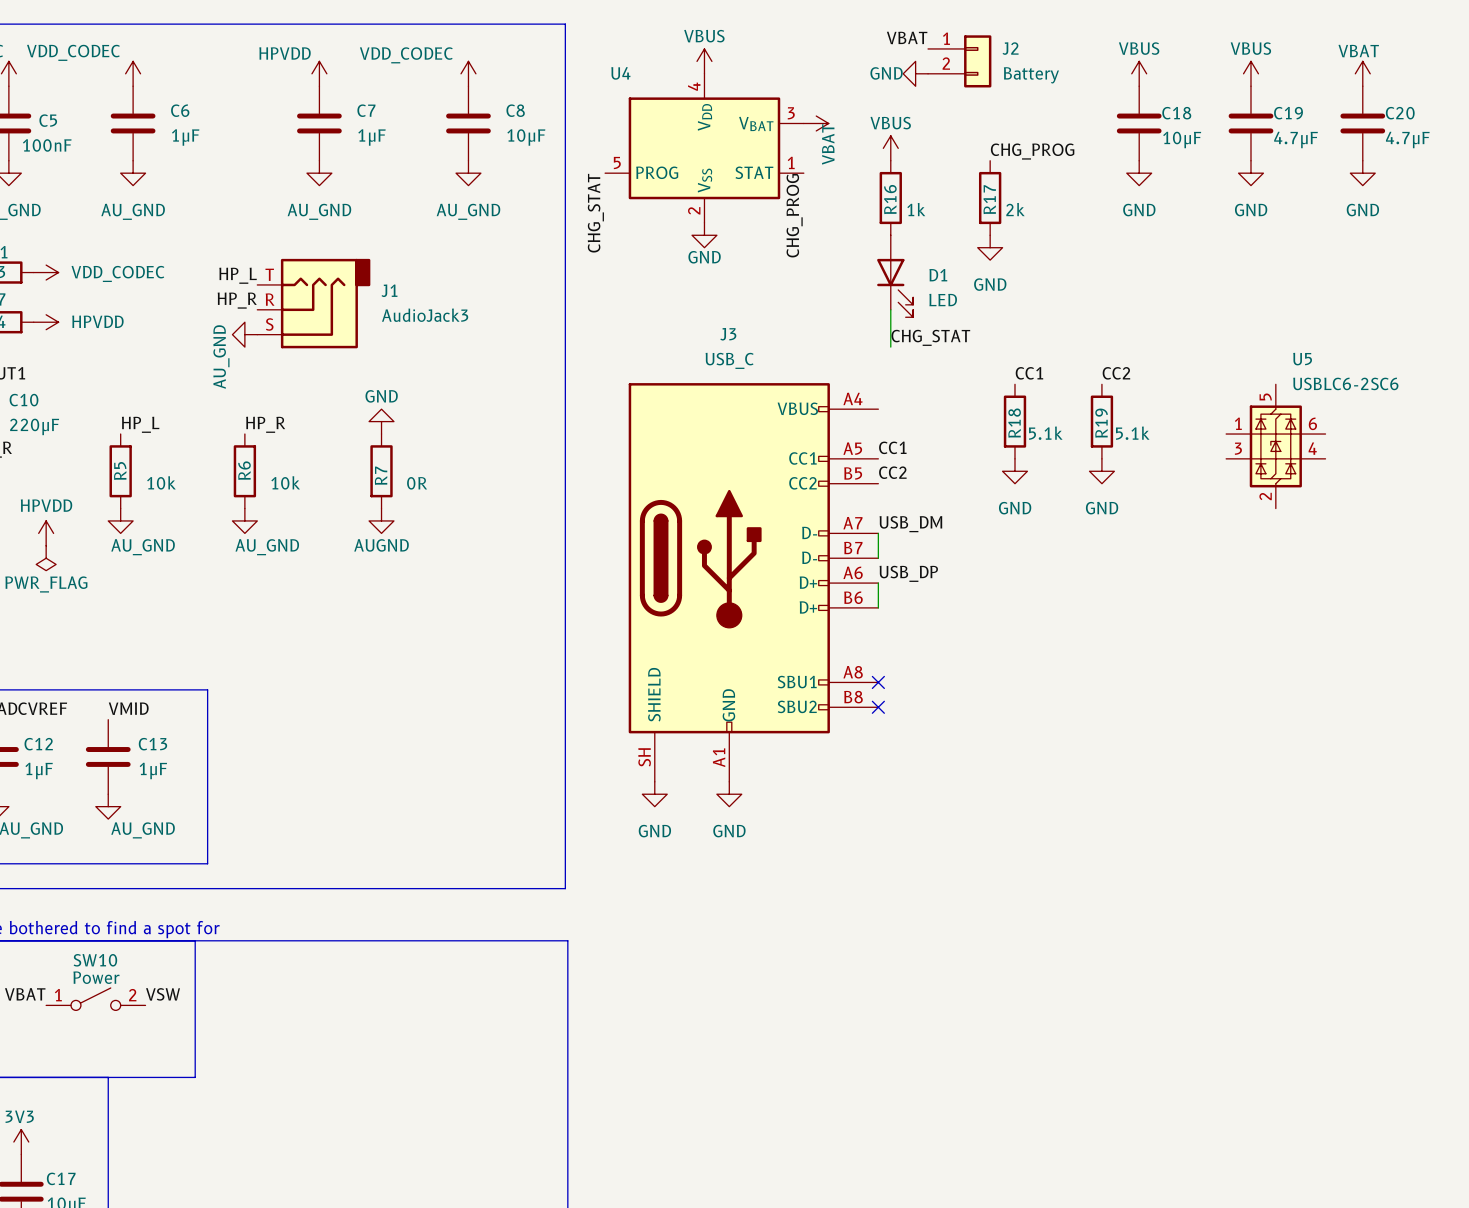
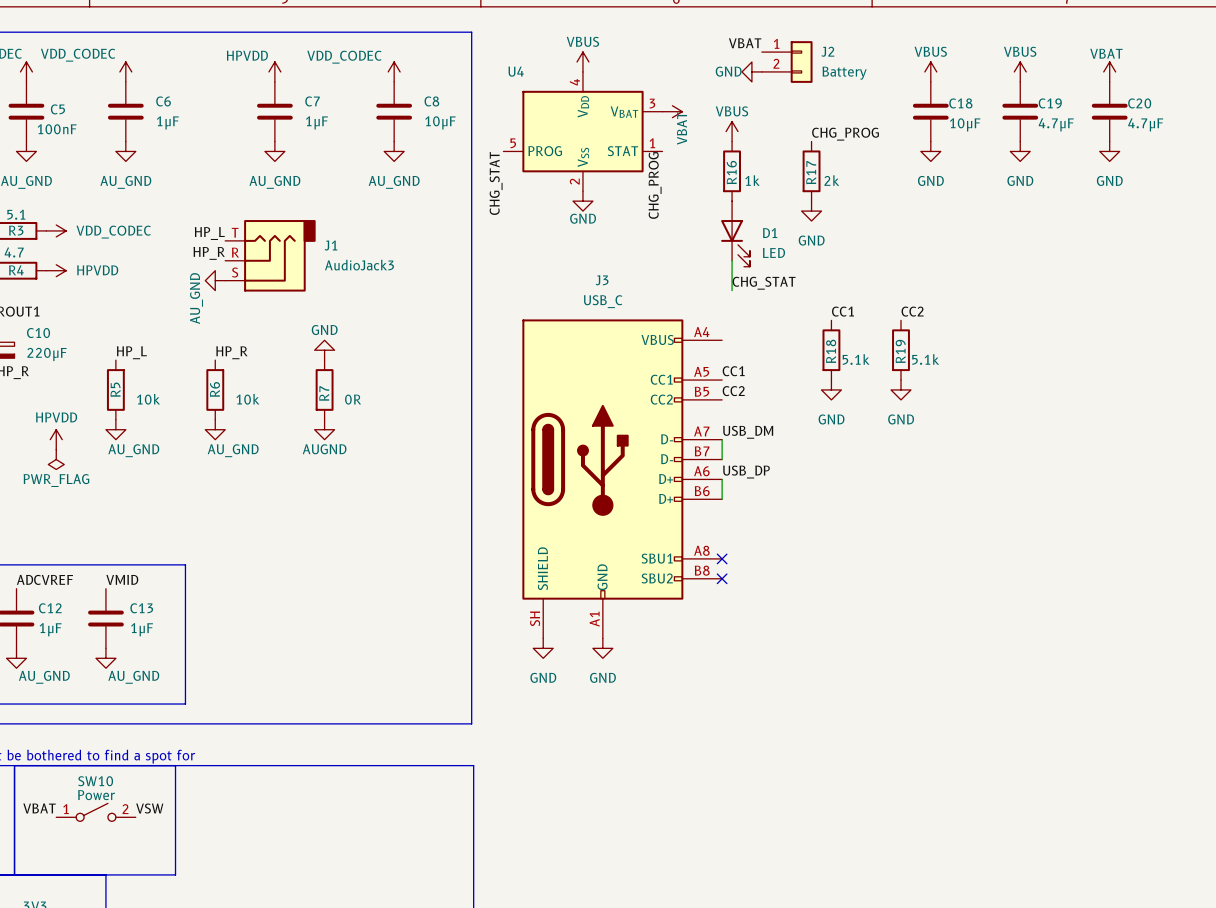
U5: USBLC6-2SC6 (1275, 446) -> none

